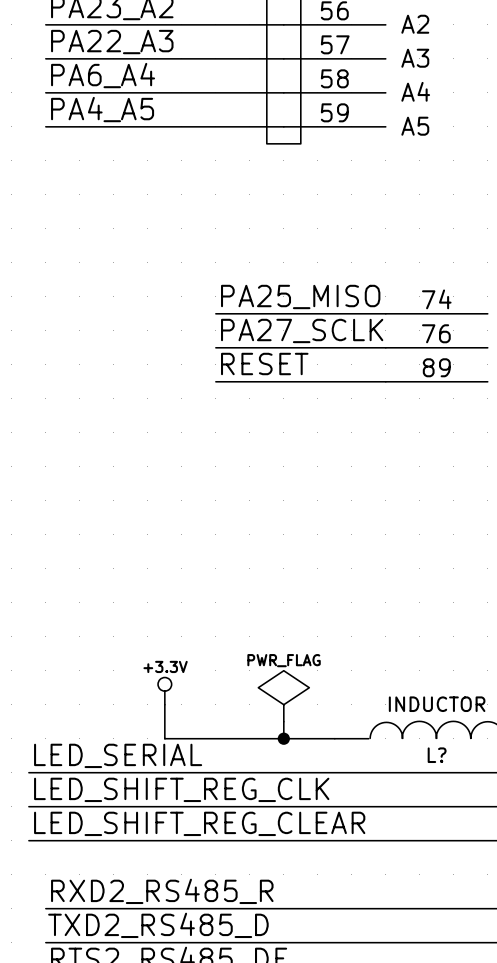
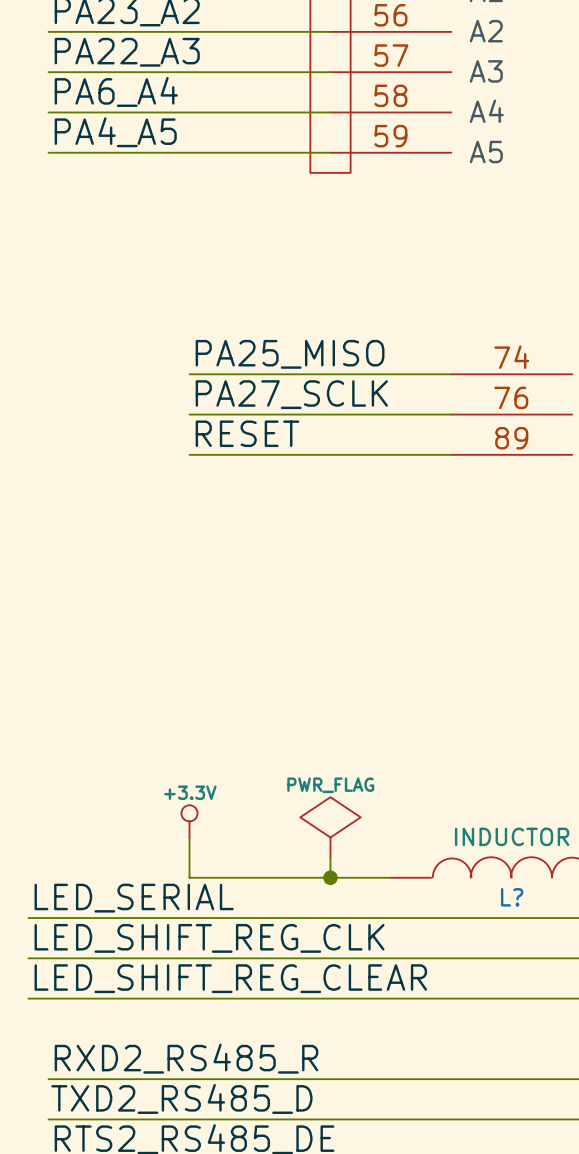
label position: PA25_MISO (300, 296) -> PA25_MISO (290, 354)
wire: none -> (189, 374) (249, 374)
label position: PA27_SCLK (302, 330) -> PA27_SCLK (291, 394)
wire: none -> (189, 414) (249, 414)
label position: RESET (264, 363) -> RESET (247, 433)
wire: none -> (189, 454) (249, 454)

